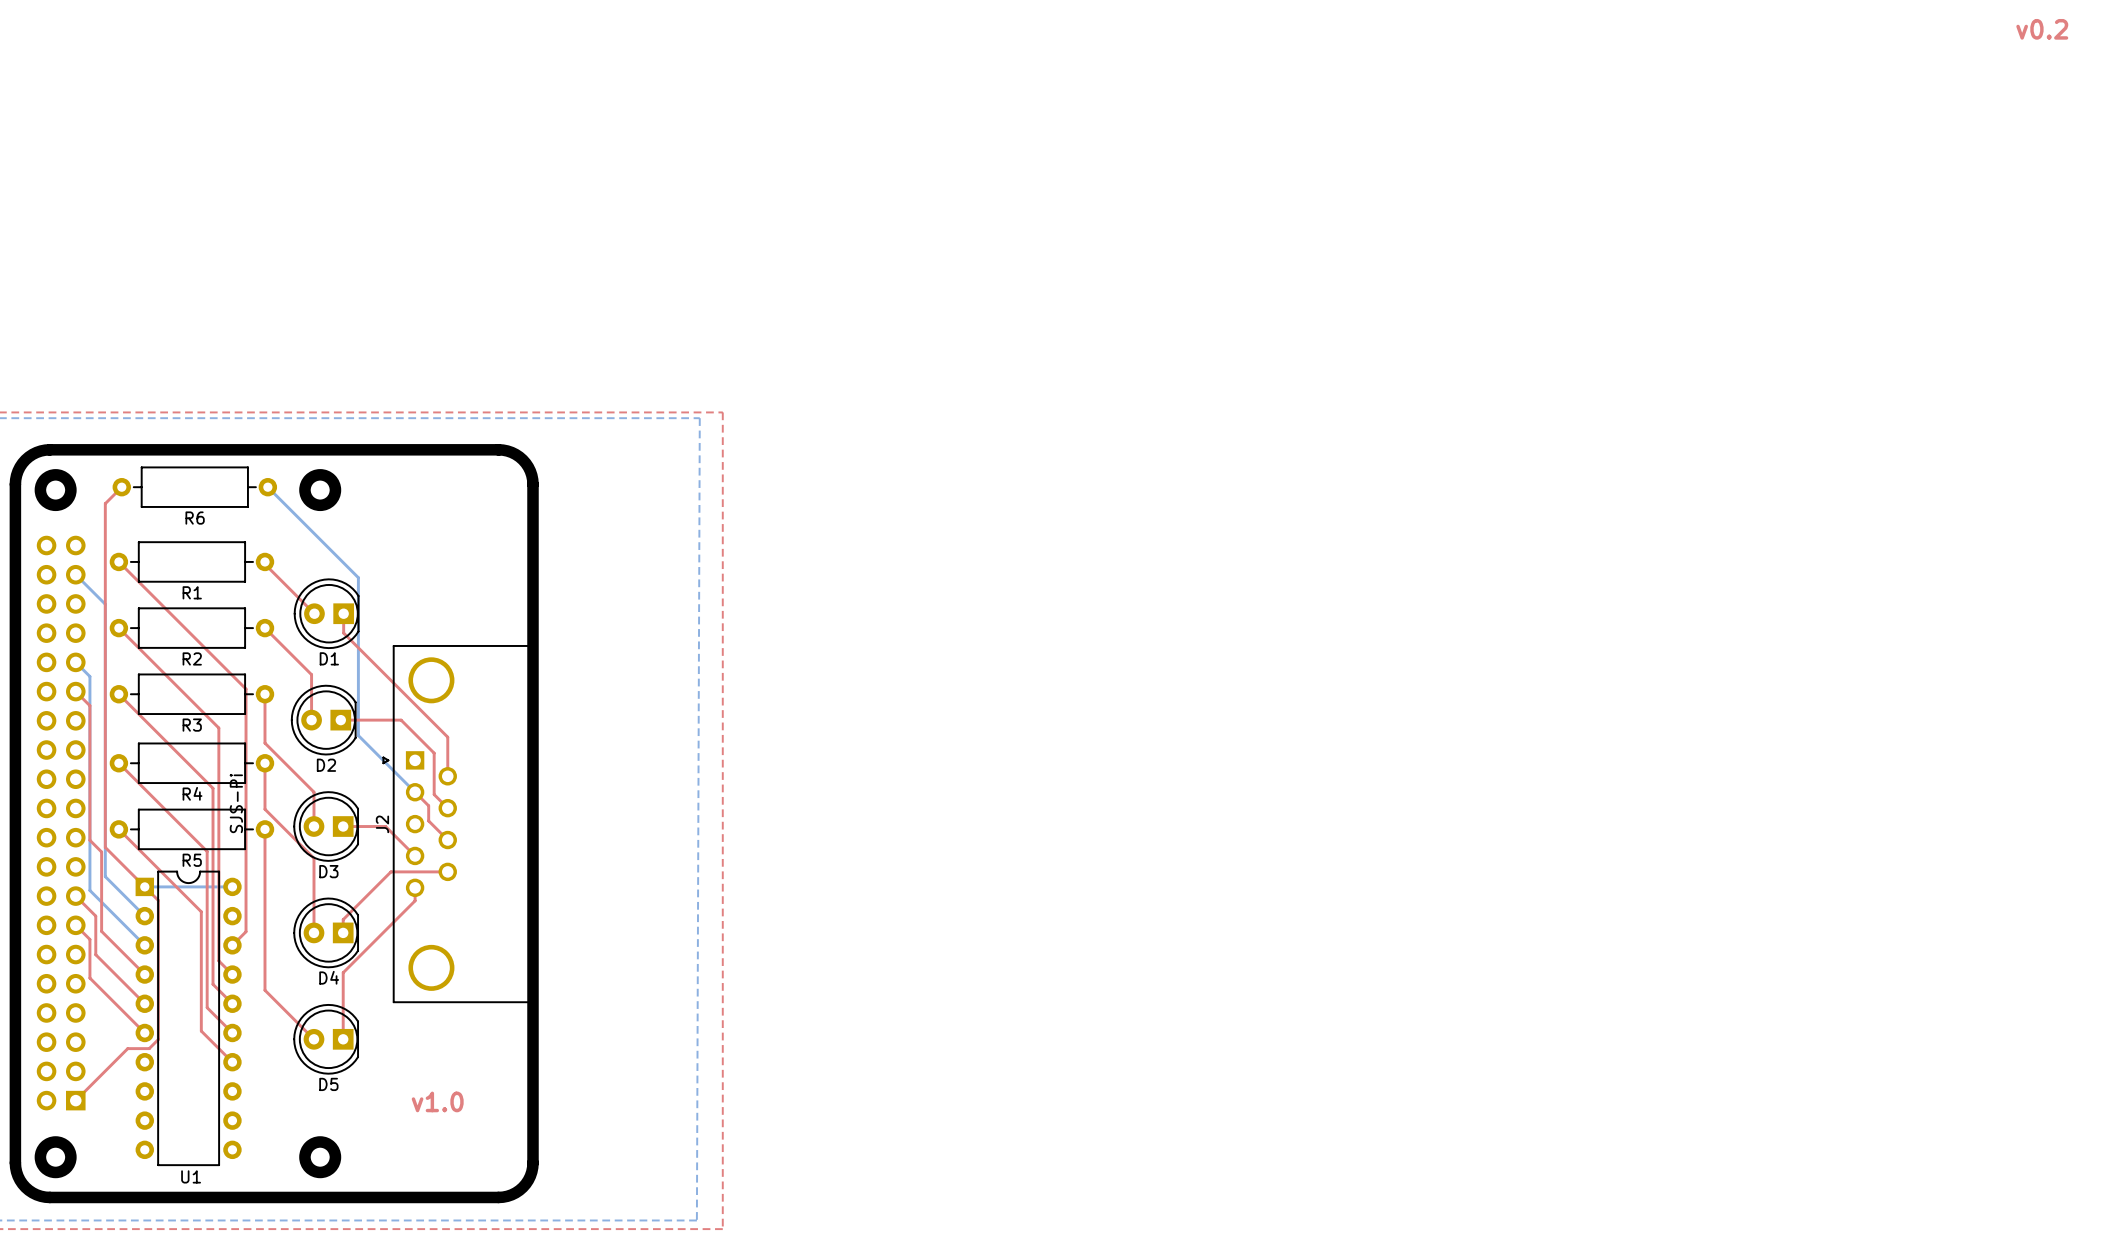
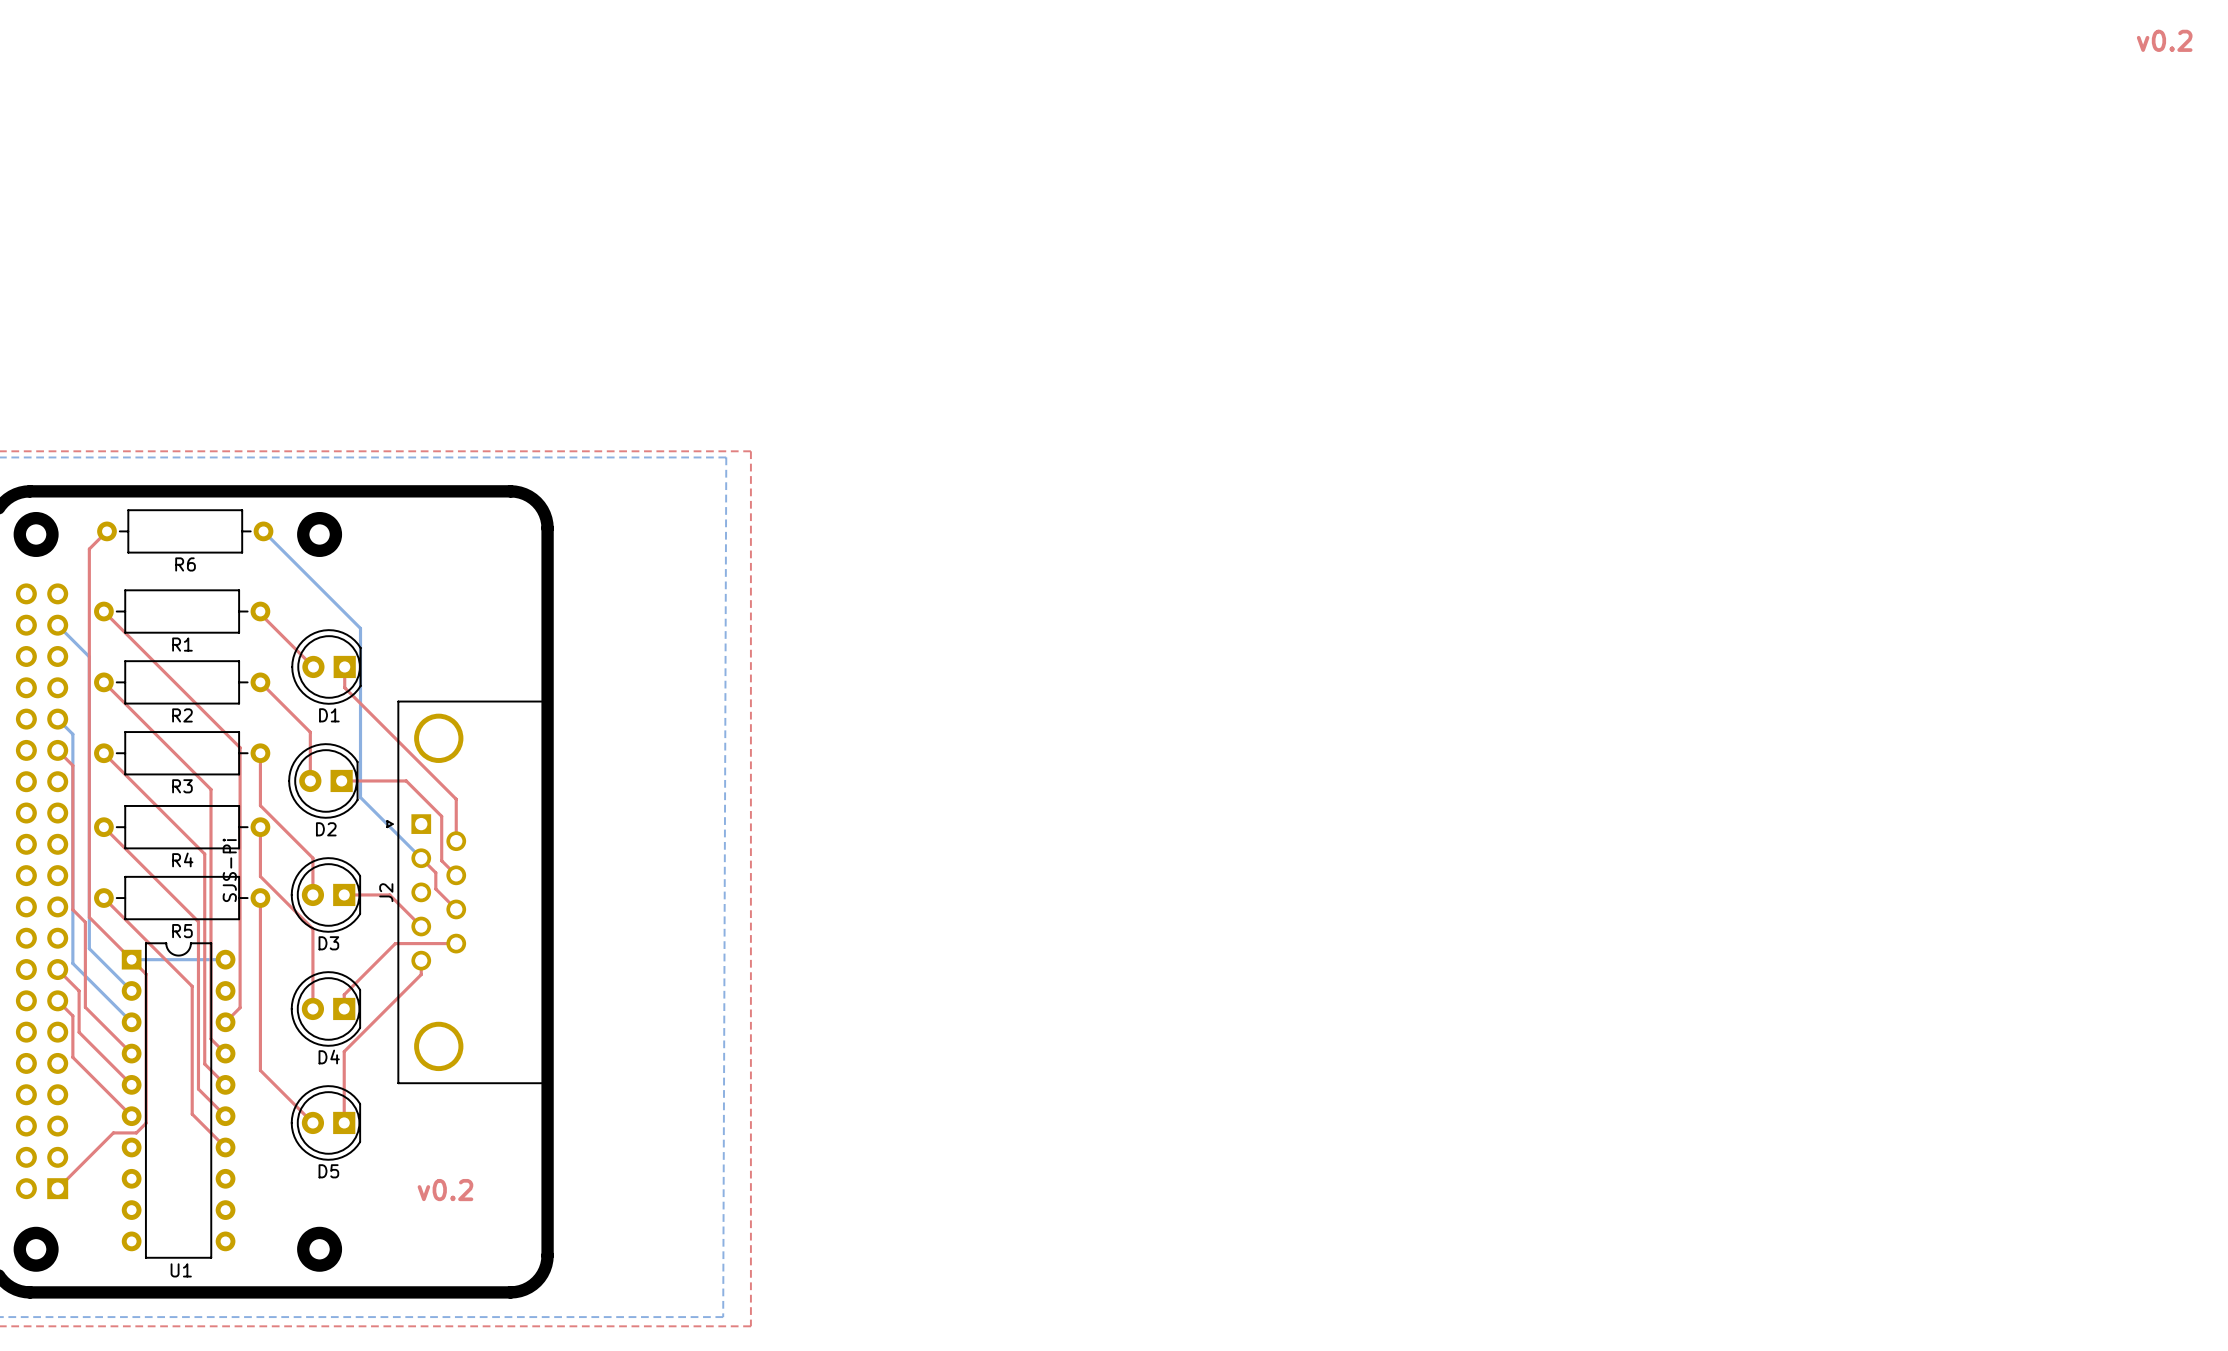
text: v1.0 (437, 1101) -> v0.2 (445, 1190)

